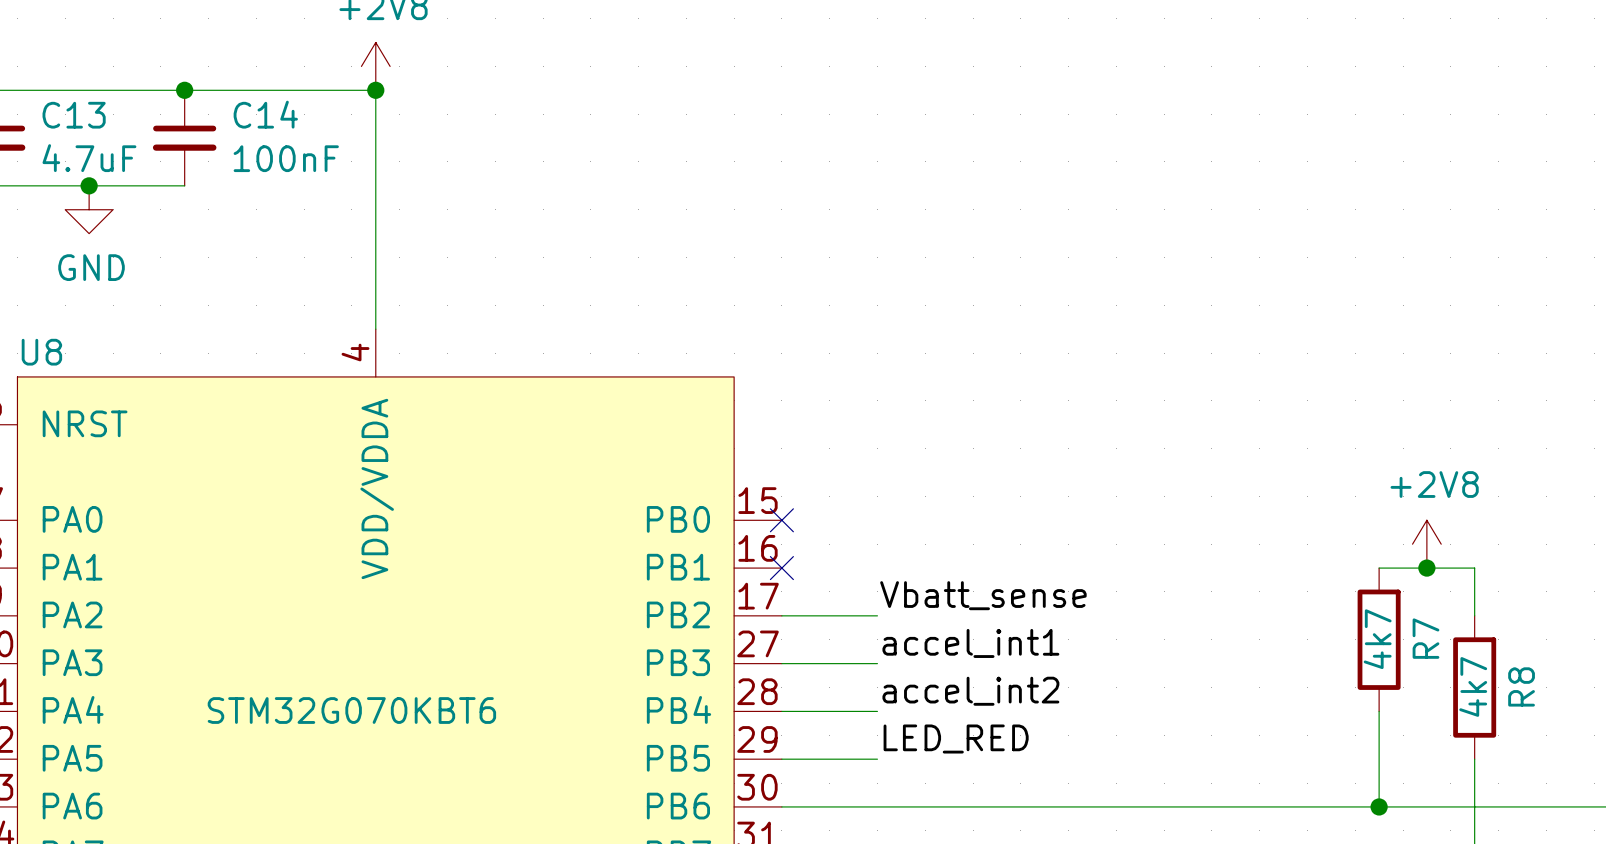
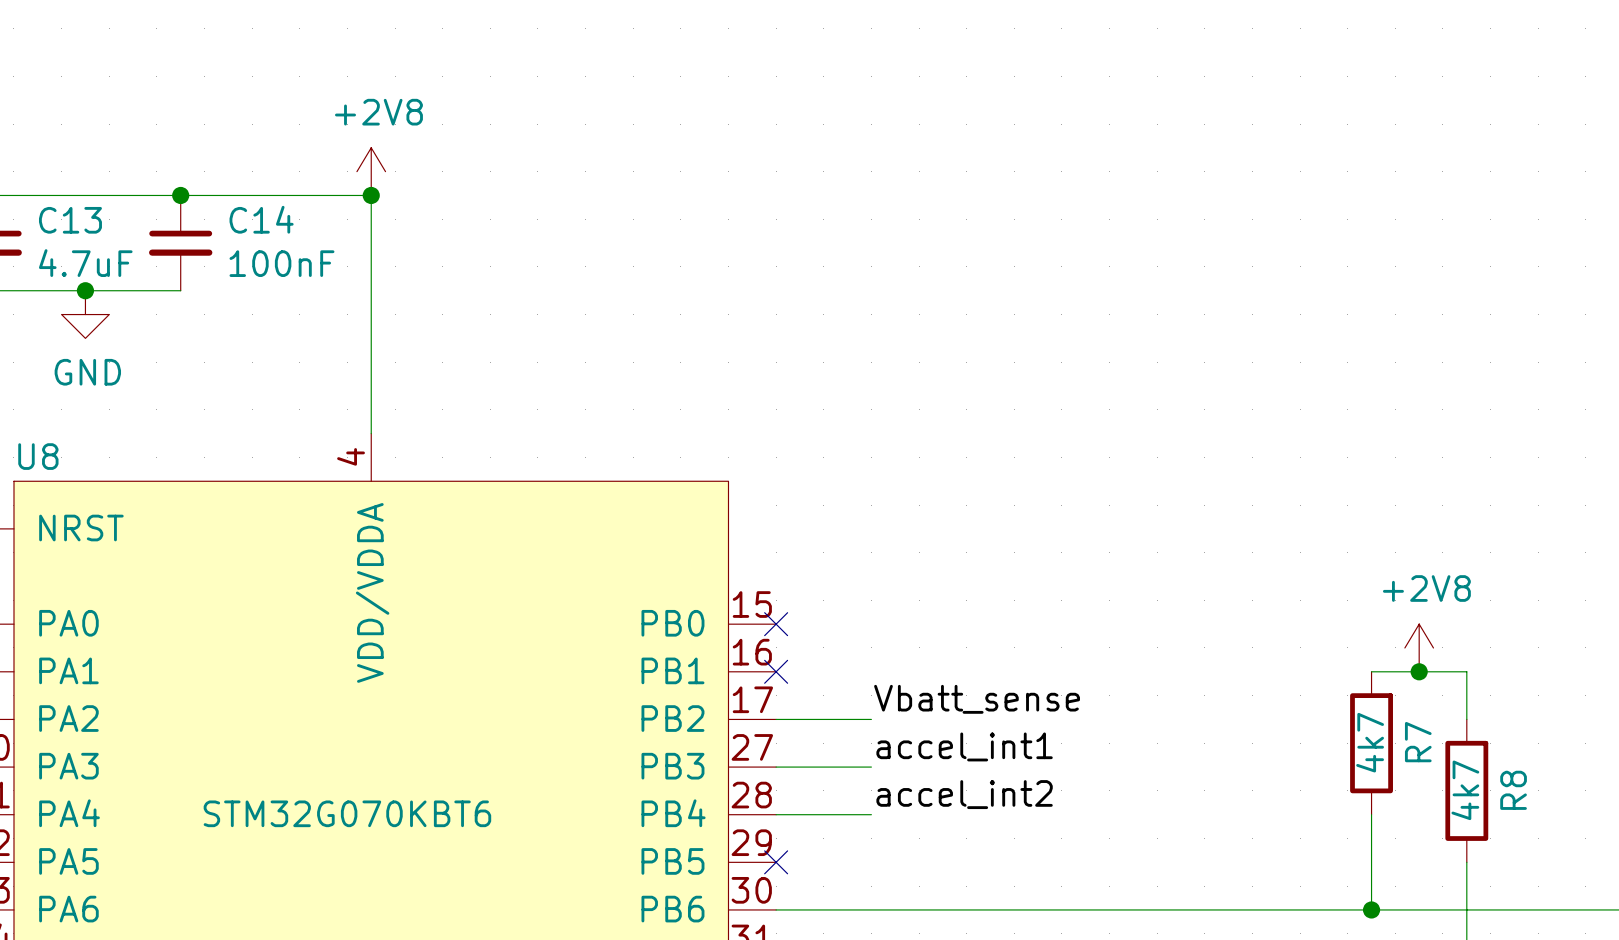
label: LED_RED (956, 739) -> none
wire: (781, 759) (877, 759) -> none
no-connect mark: none -> (776, 862)

